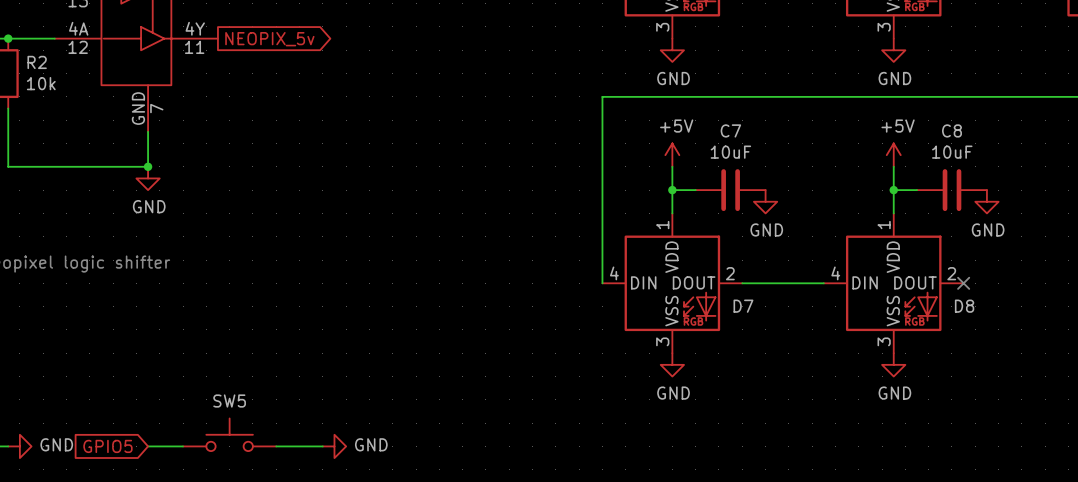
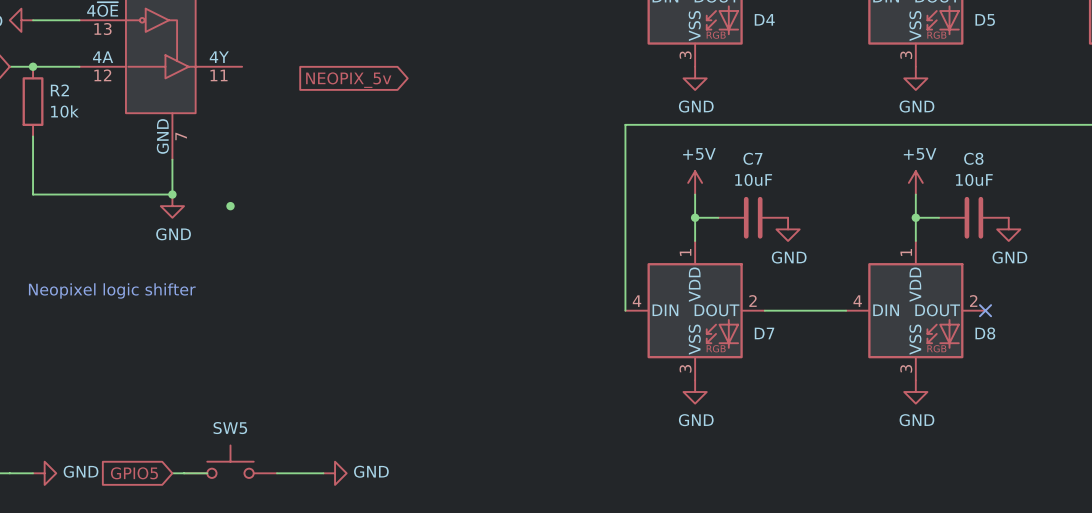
global label position: NEOPIX_5v (269, 39) -> NEOPIX_5v (348, 80)
junction: none -> (230, 206)
SW5 position: (229, 434) -> (230, 461)
power symbol position: GND (334, 446) -> GND (335, 473)

